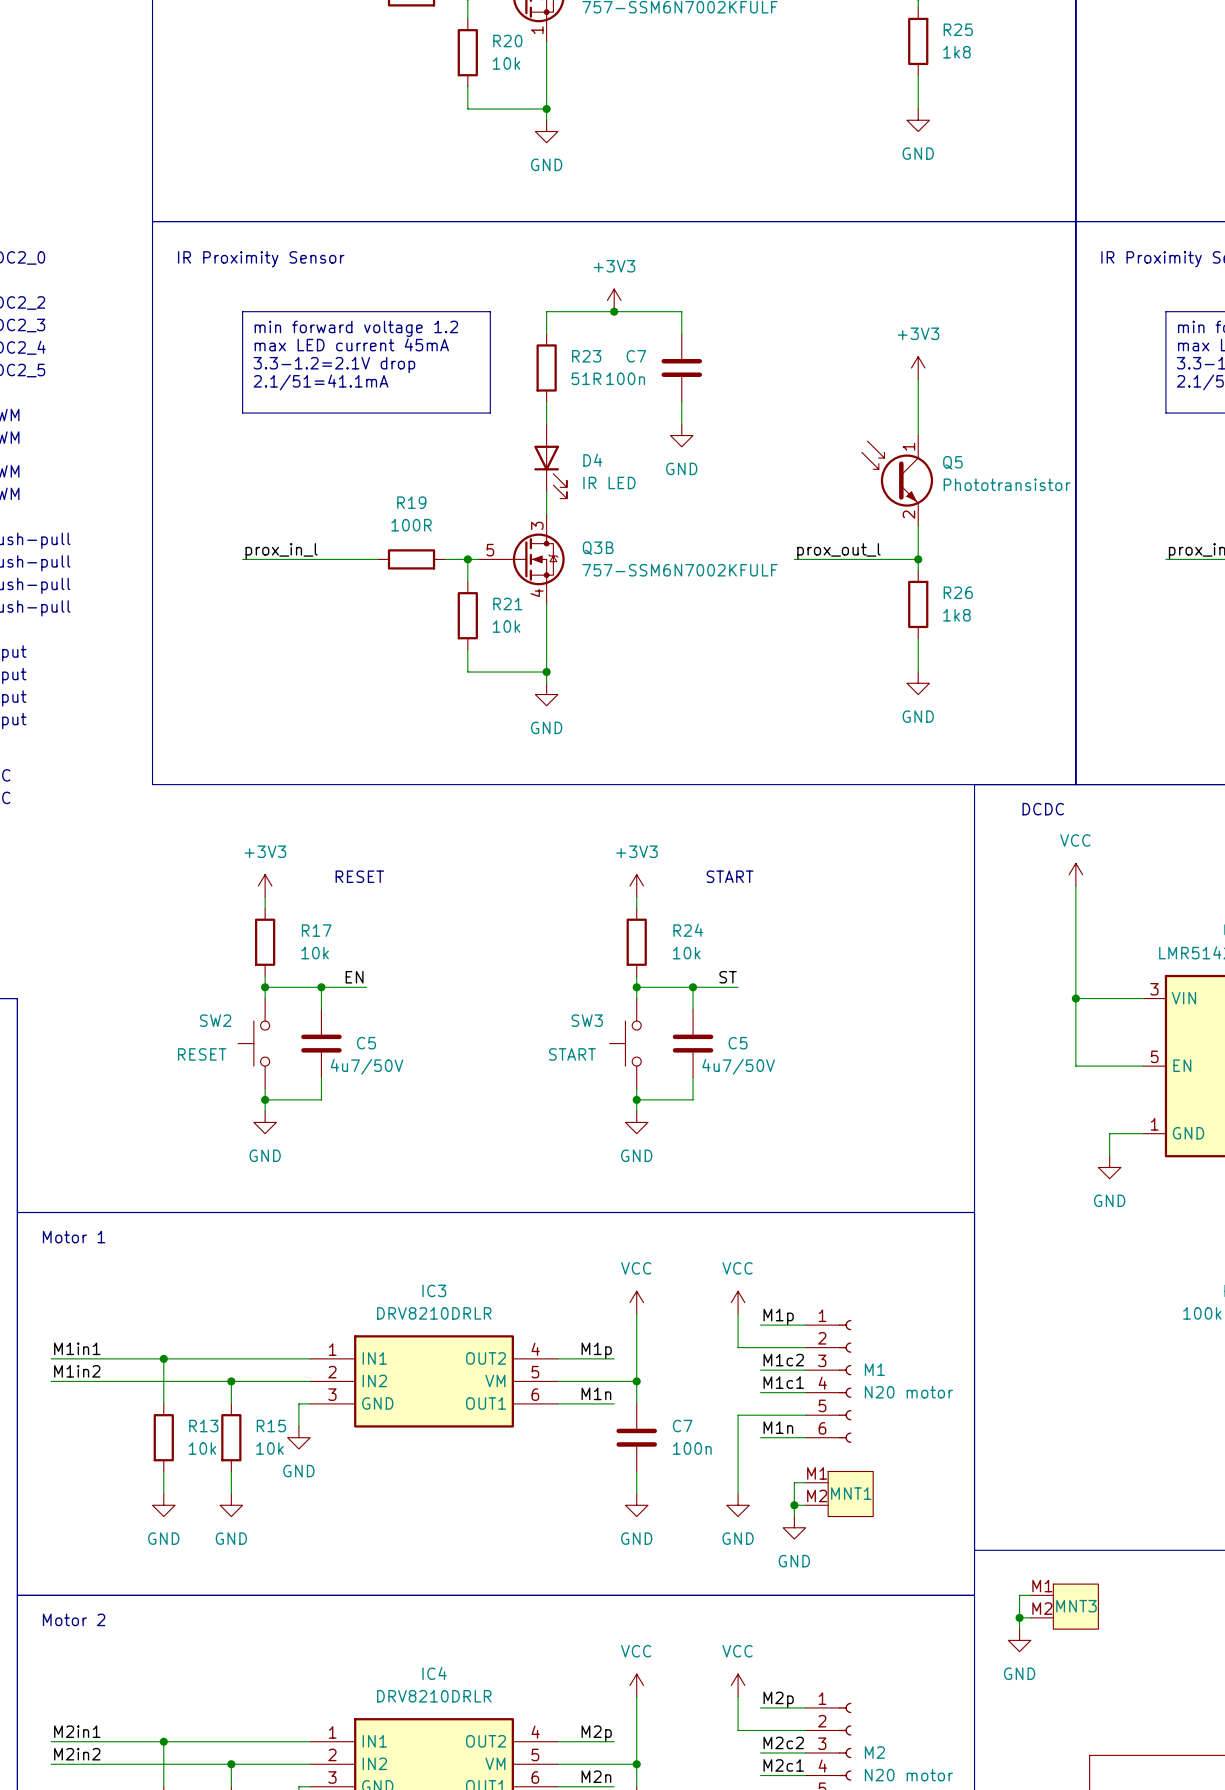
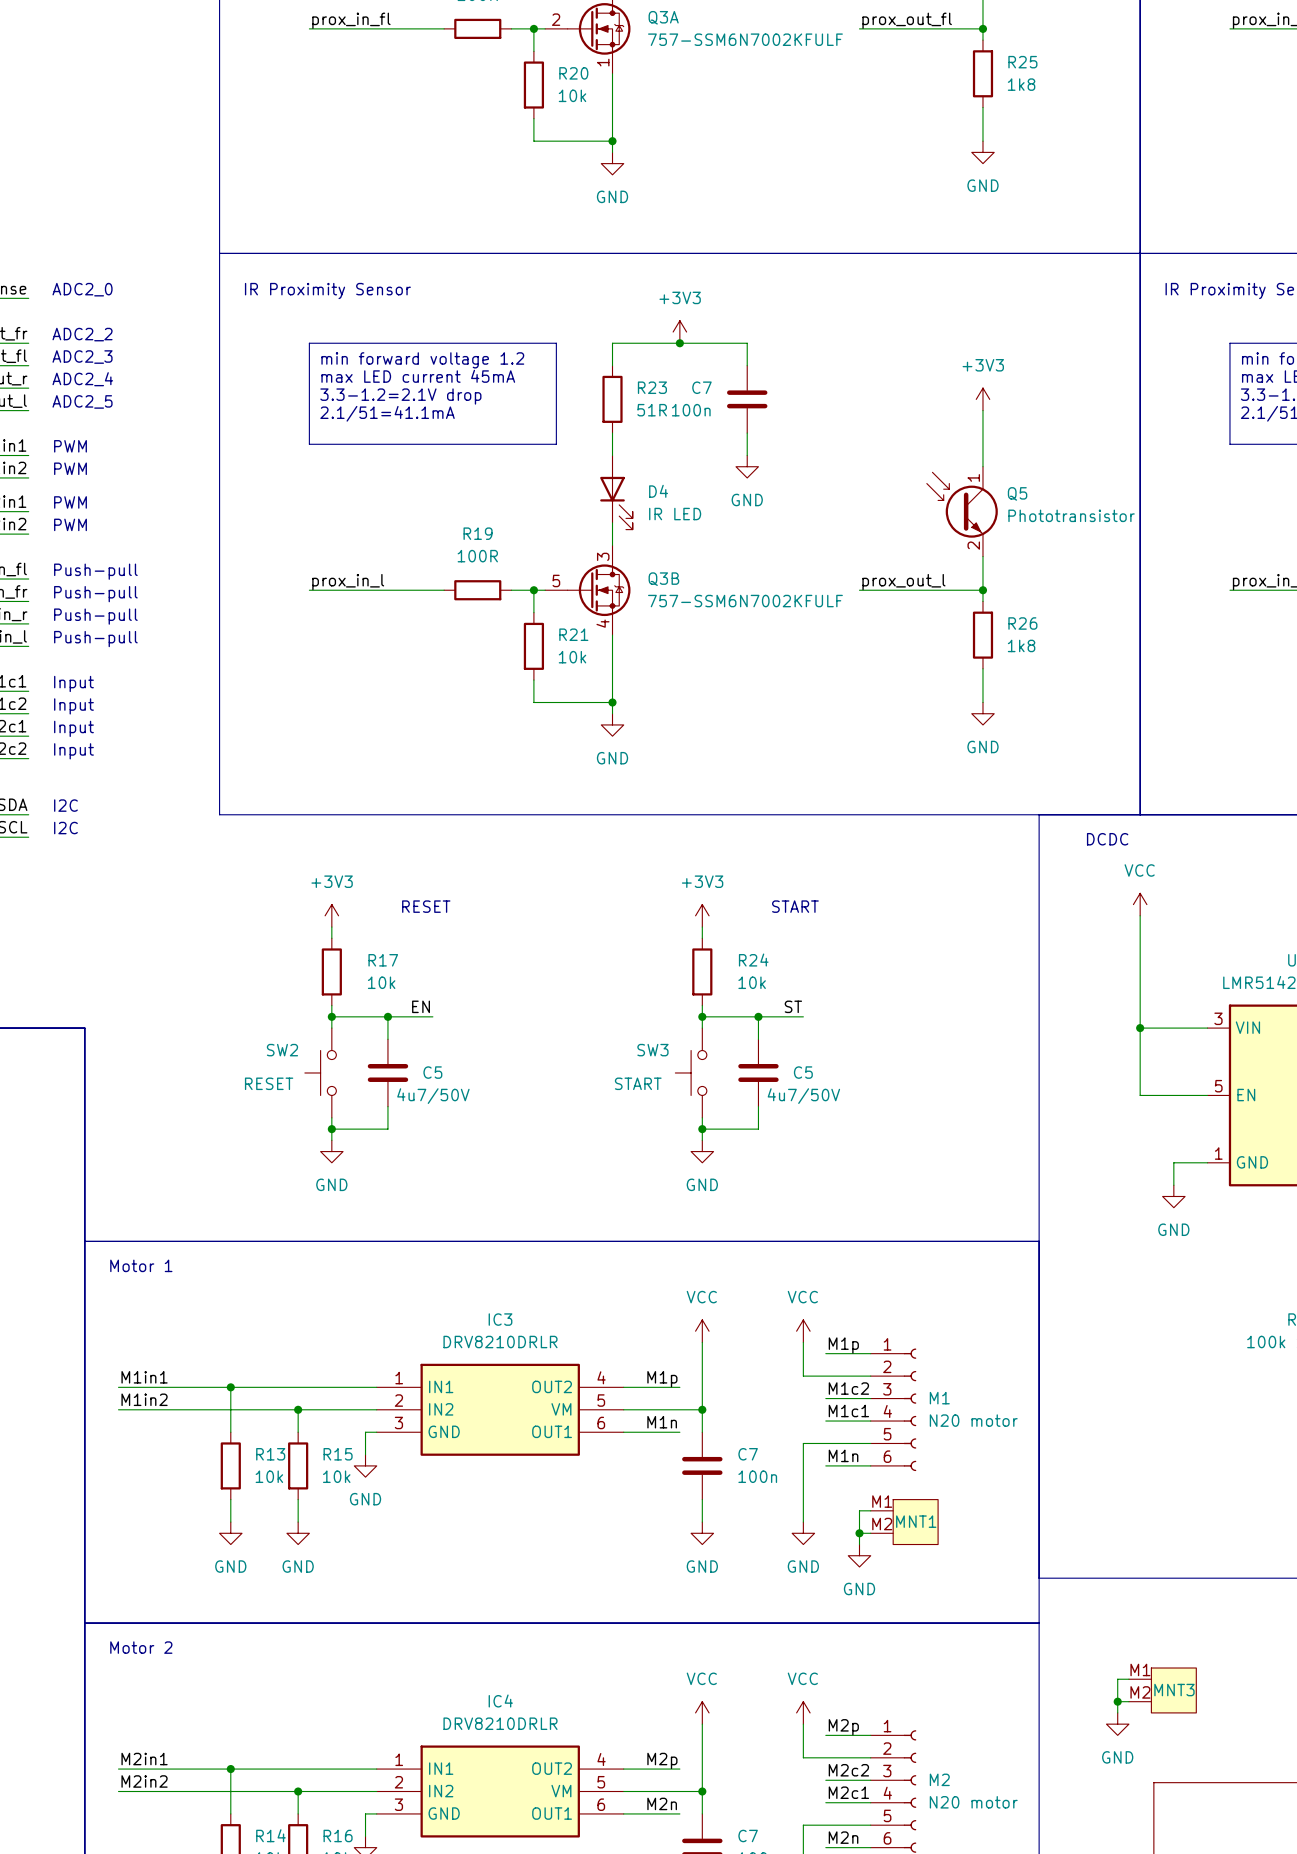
wire: (1030, 1595) (1019, 1595) (1019, 1629) -> (1128, 1679) (1117, 1679) (1117, 1712)
MNT3 position: (1064, 1606) -> (1162, 1690)
wire: (1019, 1617) (1030, 1617) -> (1117, 1701) (1128, 1701)
junction: (1019, 1617) -> none
power symbol position: GND (1019, 1640) -> GND (1117, 1724)
junction: none -> (1117, 1701)

